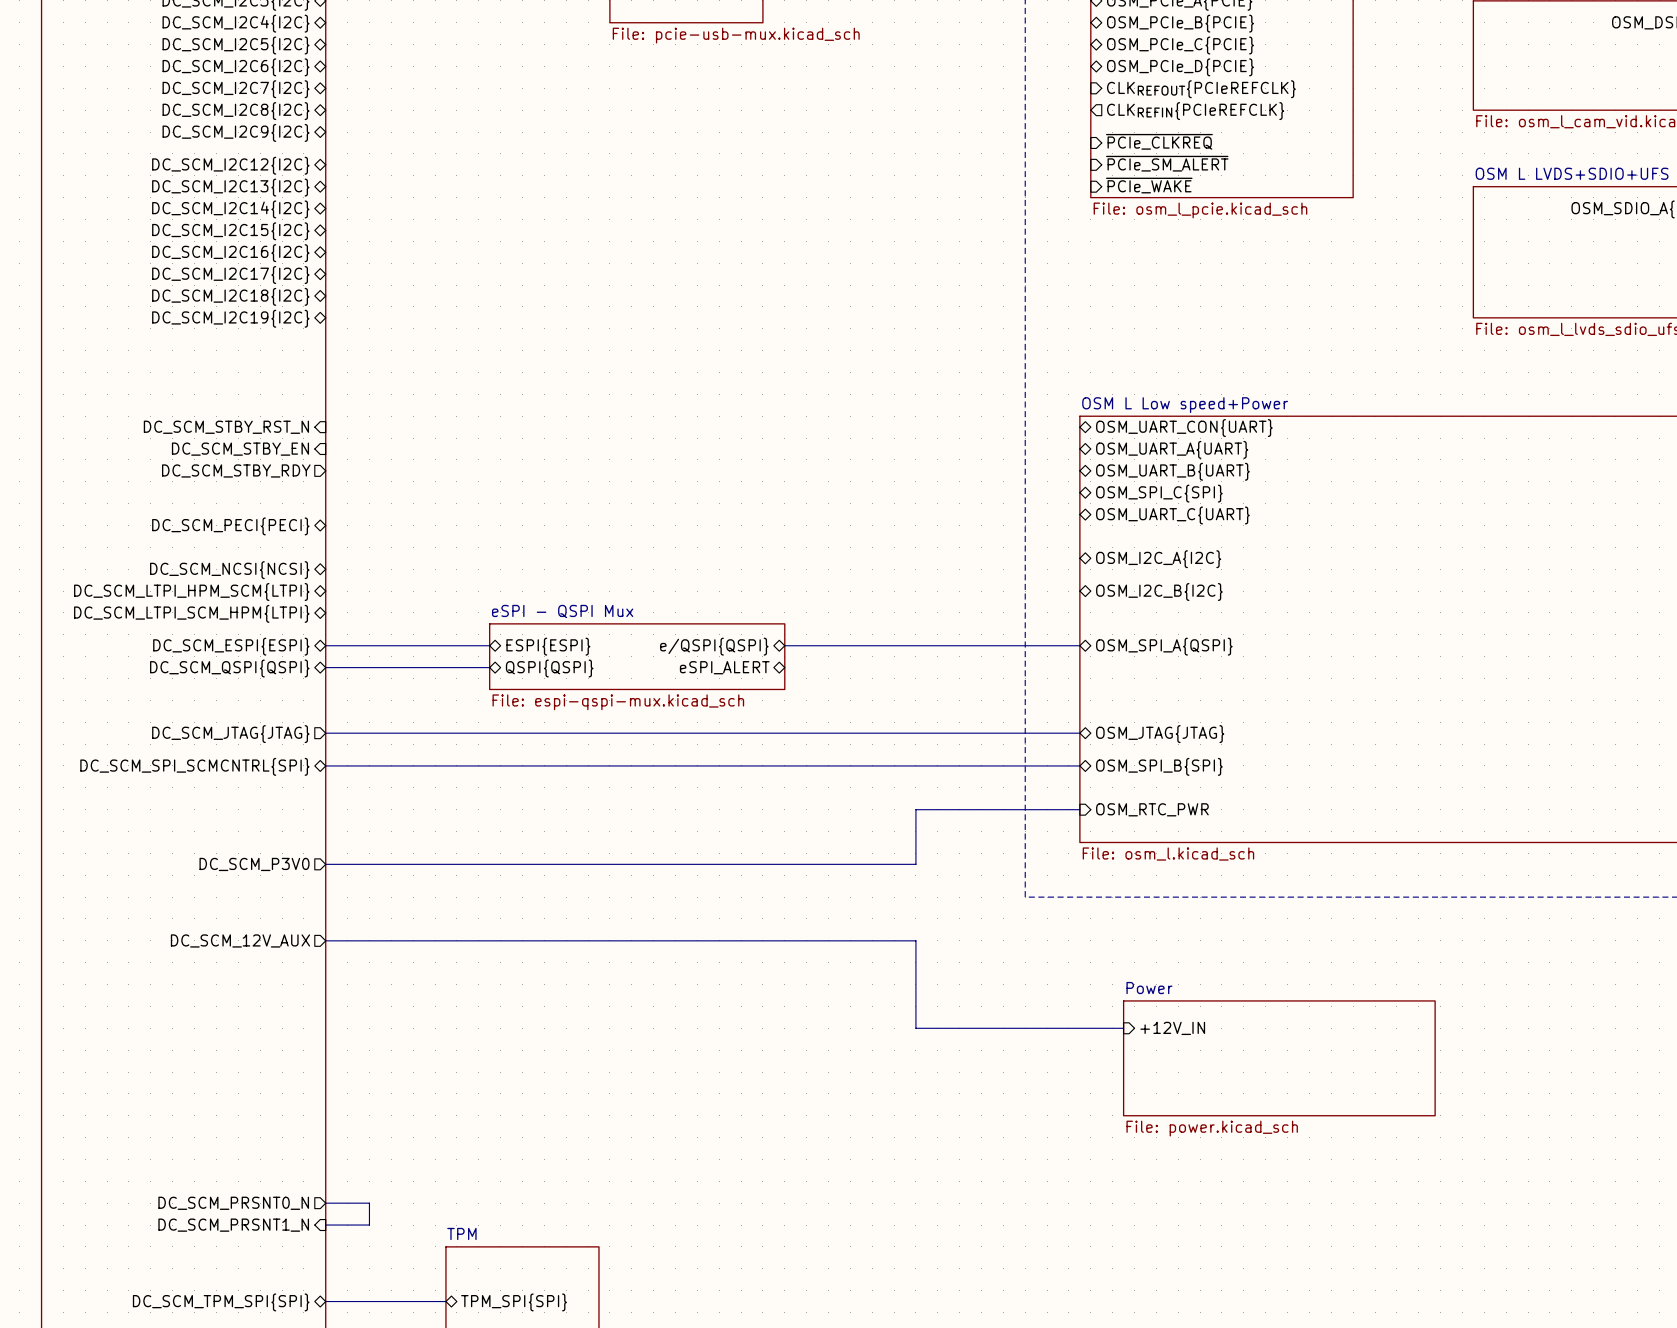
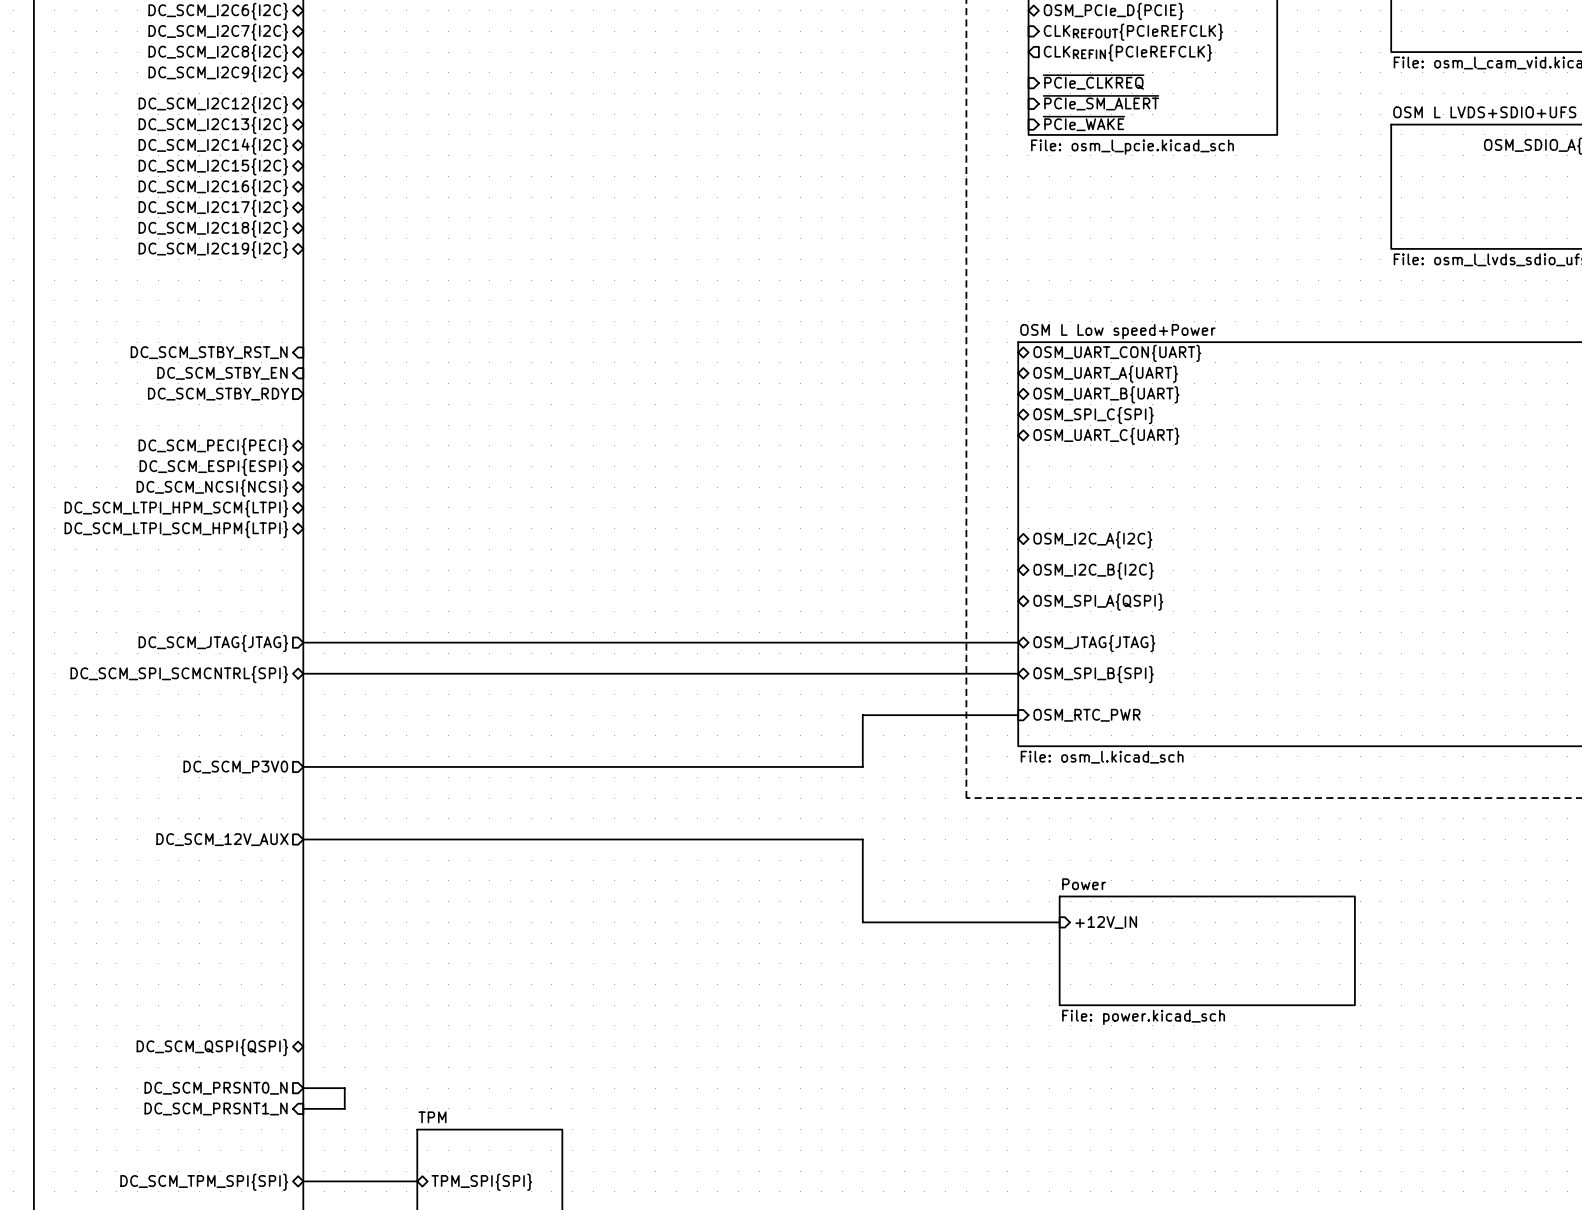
sheet pin position: OSM_I2C_A{I2C} (1158, 559) -> OSM_I2C_A{I2C} (1092, 539)
sheet pin position: OSM_I2C_B{I2C} (1159, 591) -> OSM_I2C_B{I2C} (1093, 570)
bus: (325, 645) (489, 645) -> none
bus: (784, 645) (1079, 645) -> none
sheet pin position: DC_SCM_ESPI{ESPI} (231, 646) -> DC_SCM_ESPI{ESPI} (213, 467)
sheet pin: ESPI{ESPI} (548, 646) -> none
sheet pin: e/QSPI{QSPI} (714, 646) -> none
sheet pin position: OSM_SPI_A{QSPI} (1164, 646) -> OSM_SPI_A{QSPI} (1098, 602)
sheet eSPI - QSPI Mux: File: espi-qspi-mux.kicad_sch (637, 656) -> none
bus: (325, 667) (489, 667) -> none
sheet pin: eSPI_ALERT (724, 667) -> none
sheet pin: DC_SCM_QSPI{QSPI} (229, 668) -> none
sheet pin: QSPI{QSPI} (549, 668) -> none
sheet pin: none -> DC_SCM_QSPI{QSPI} (212, 1047)

